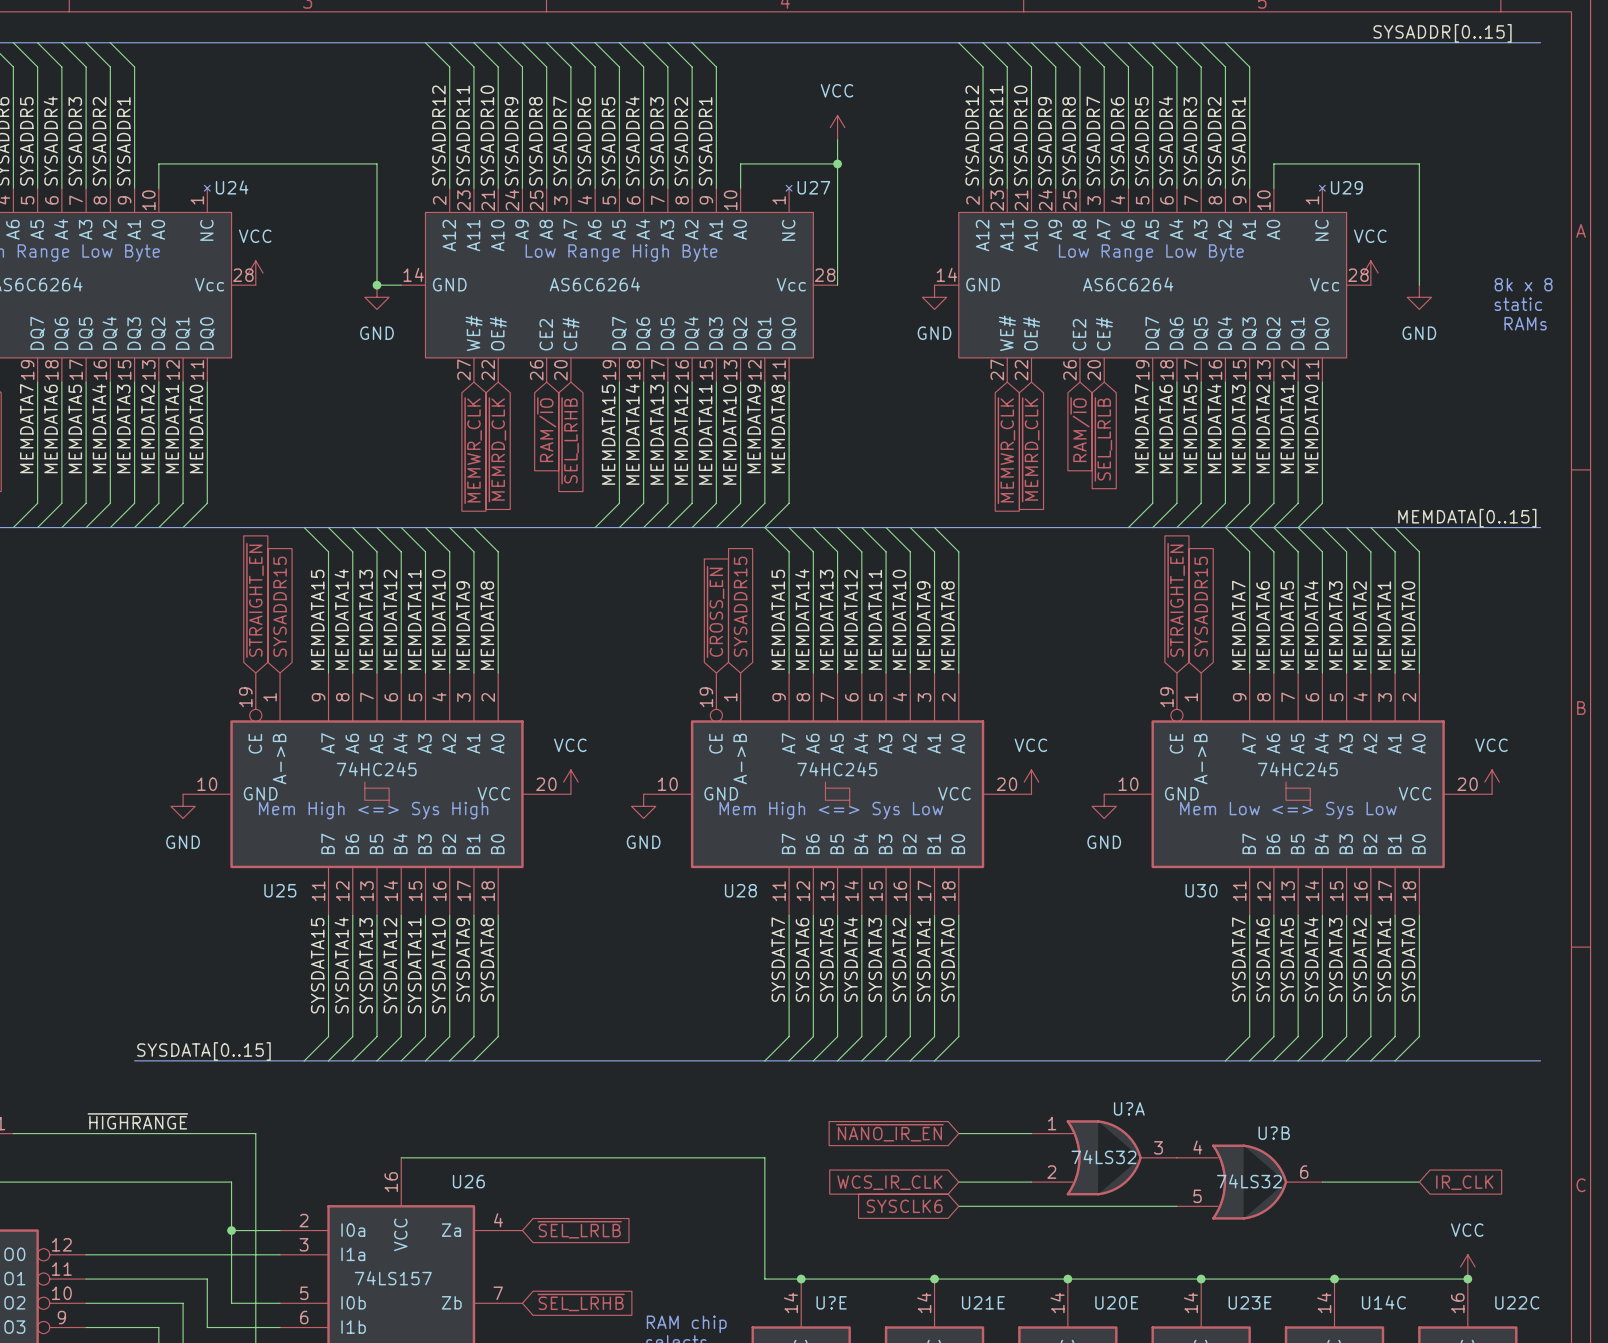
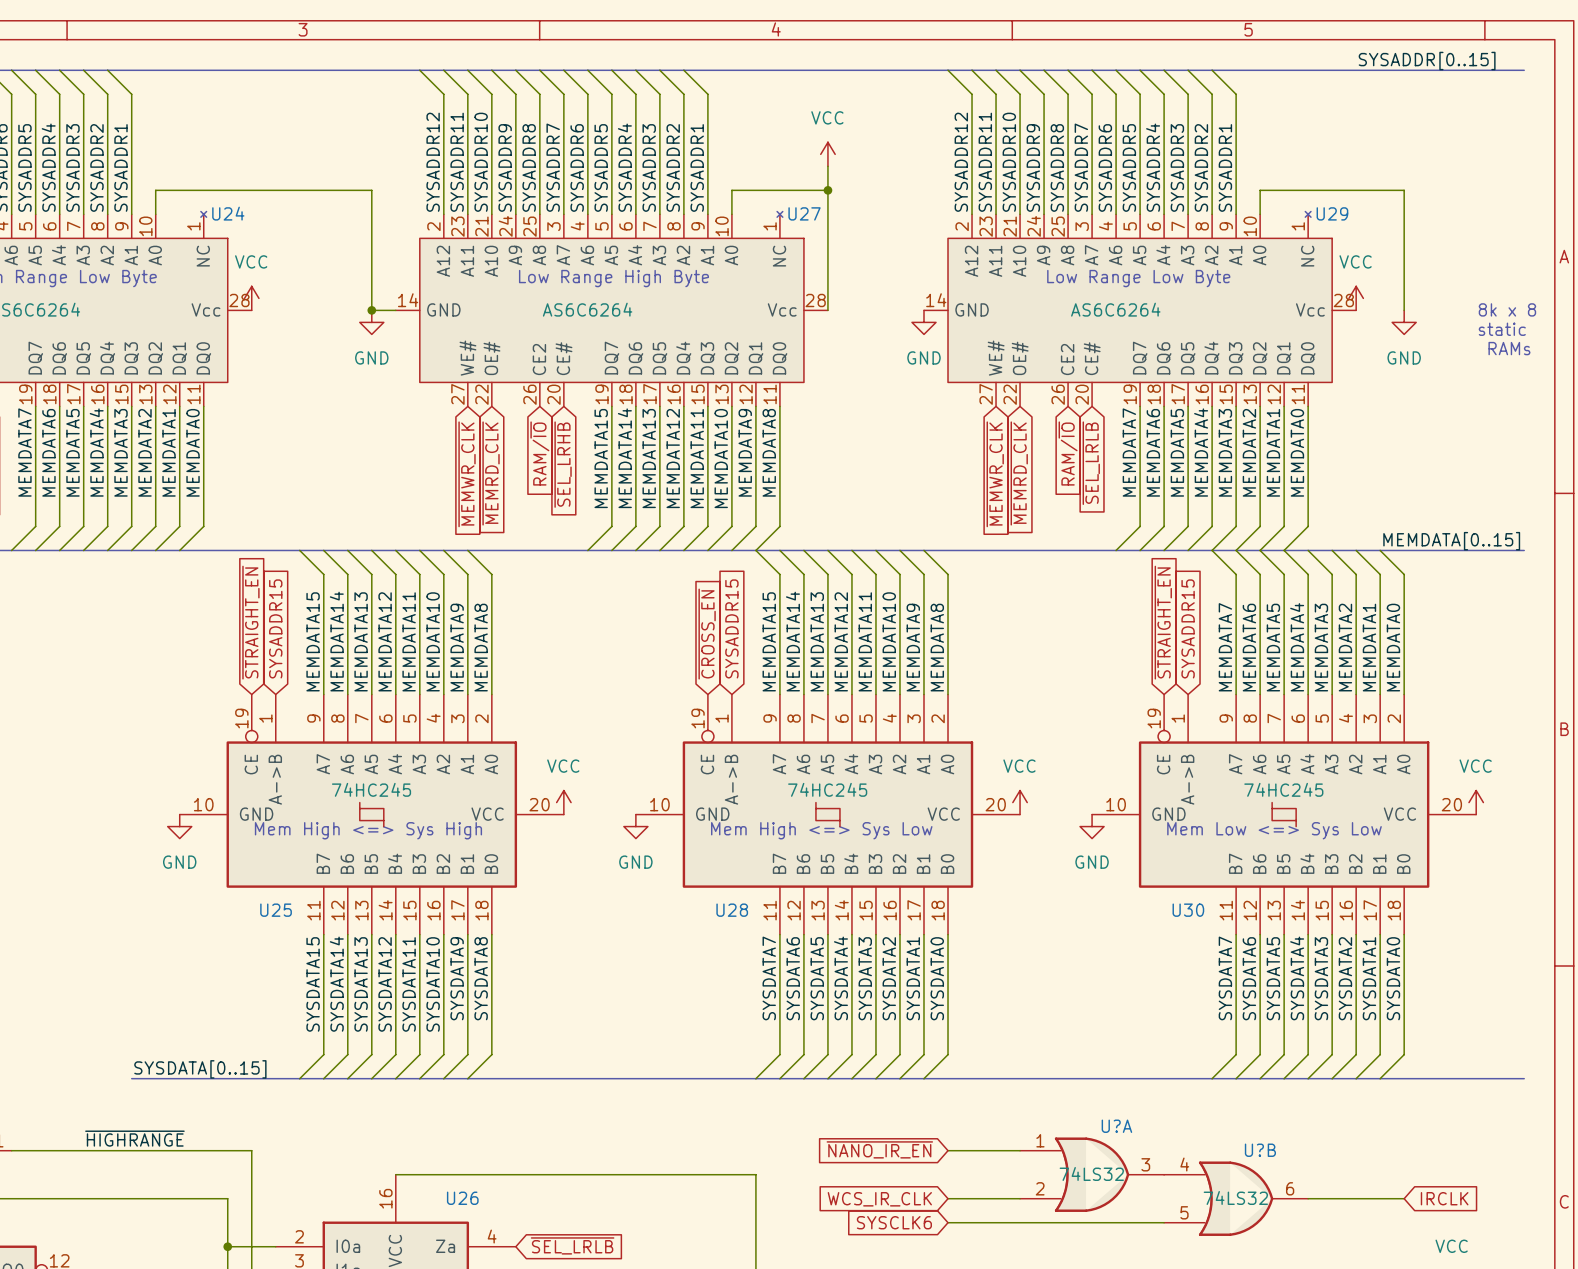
global label: IR_CLK (1464, 1182) -> IRCLK (1444, 1198)

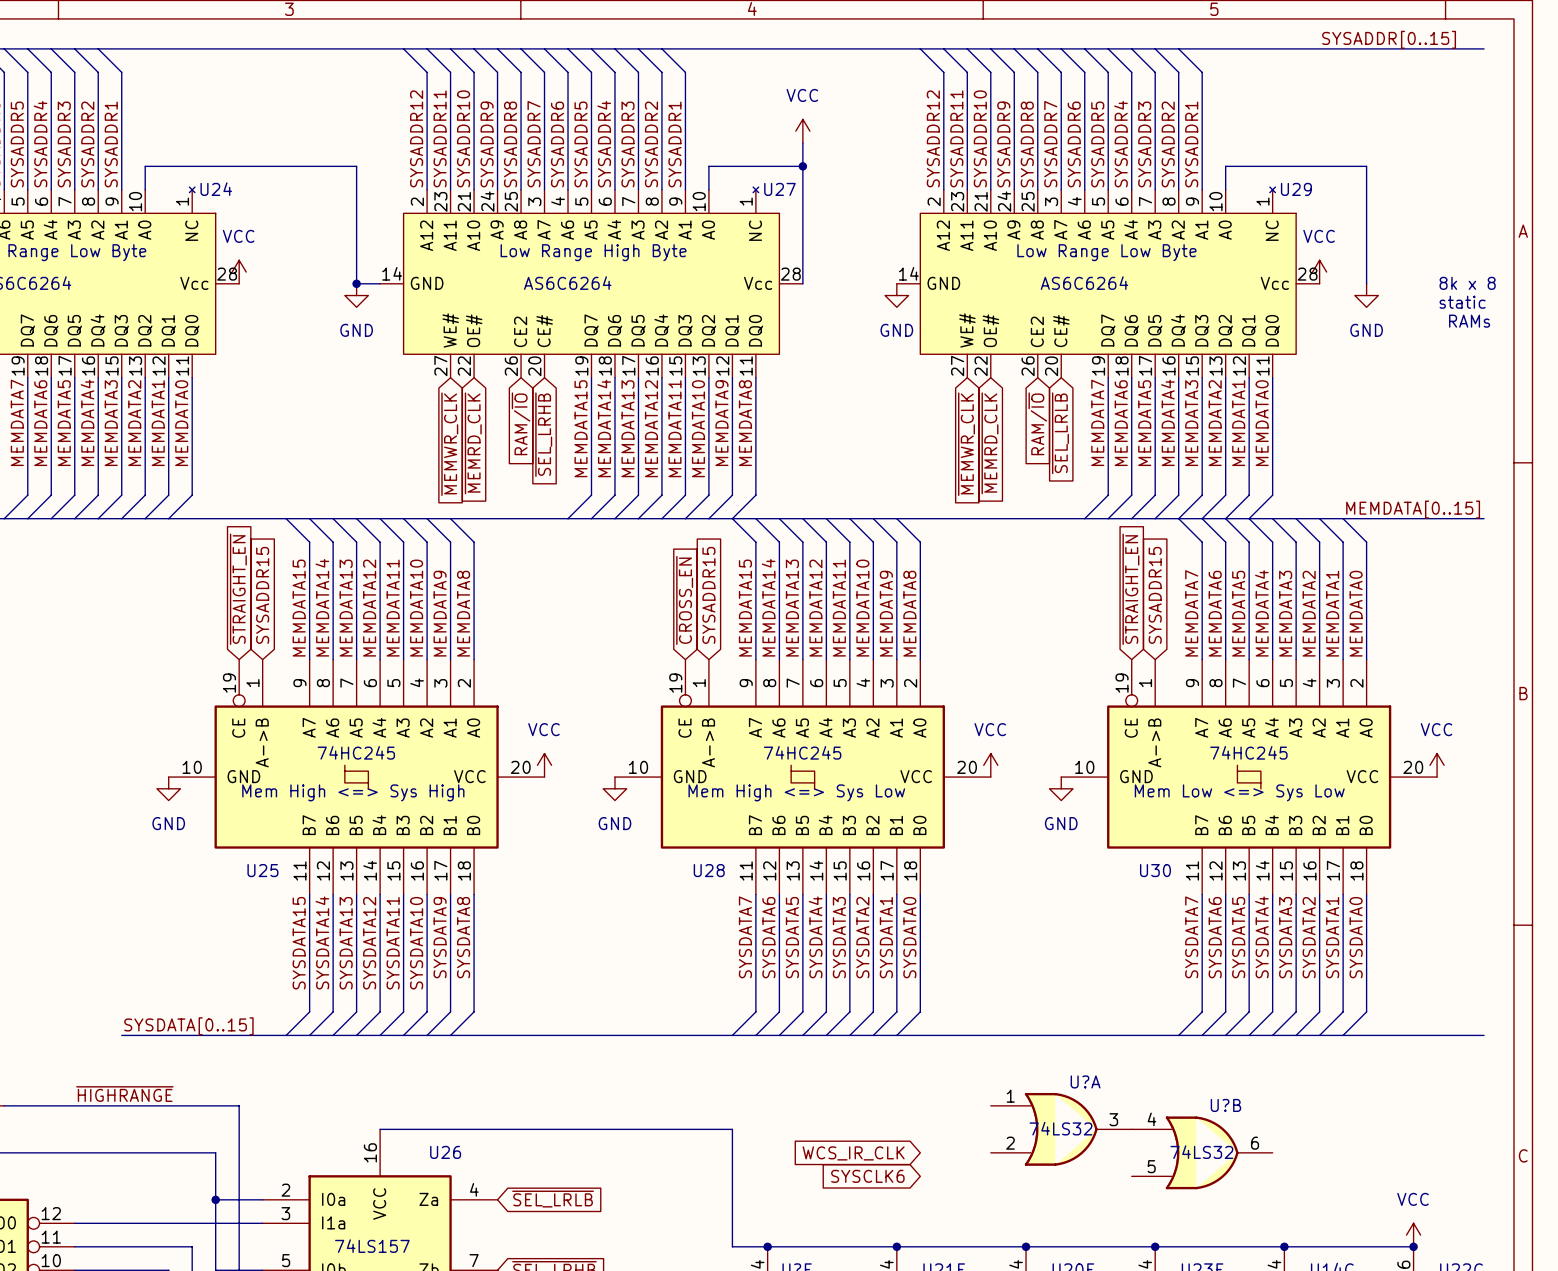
global label: ~{NANO_IR_EN} (879, 1149) -> none
wire: (948, 1150) (1020, 1150) -> none
wire: (948, 1198) (1020, 1198) -> none
wire: (1308, 1198) (1404, 1198) -> none
global label: IRCLK (1444, 1198) -> none
wire: (948, 1222) (1164, 1222) -> none

